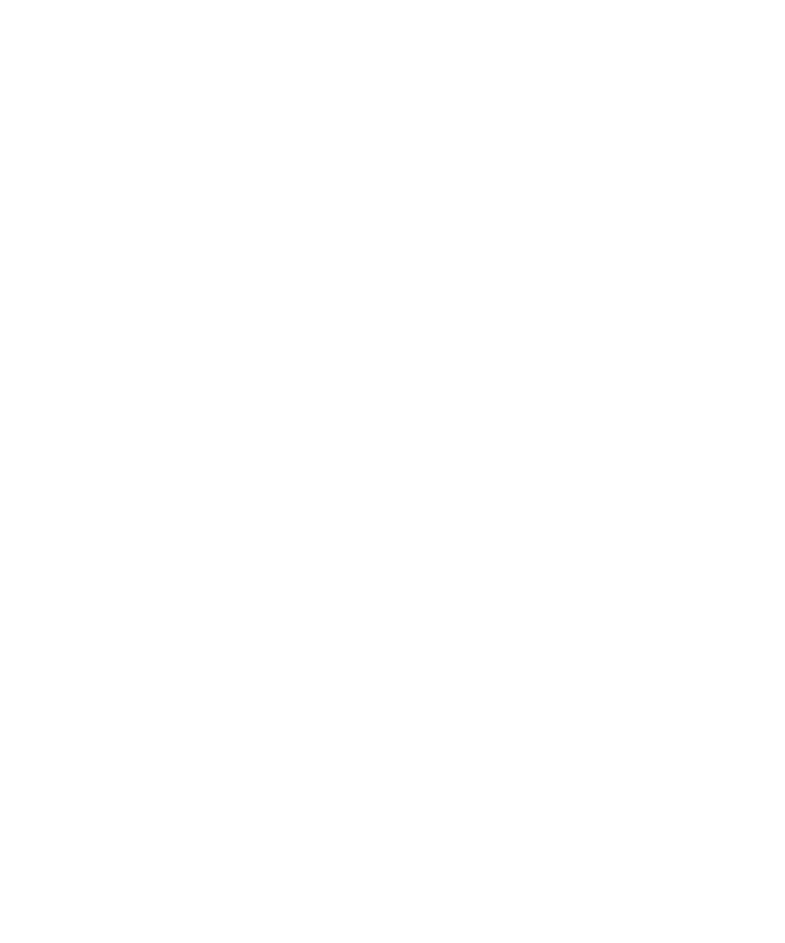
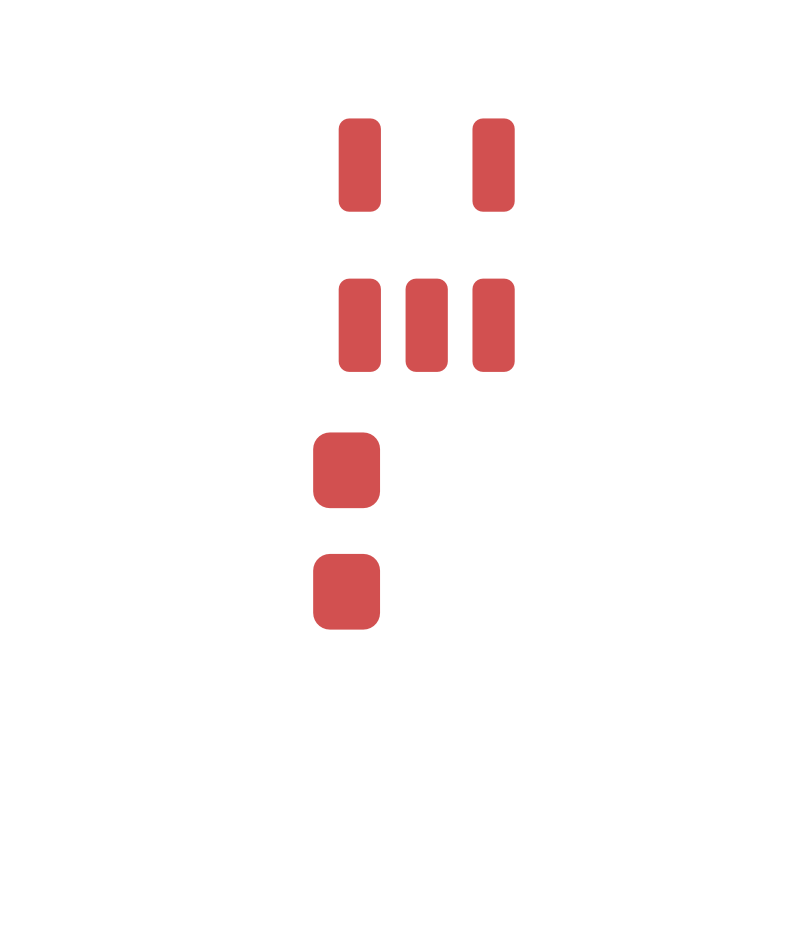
part: none -> (426, 245)
part: none -> (346, 531)

